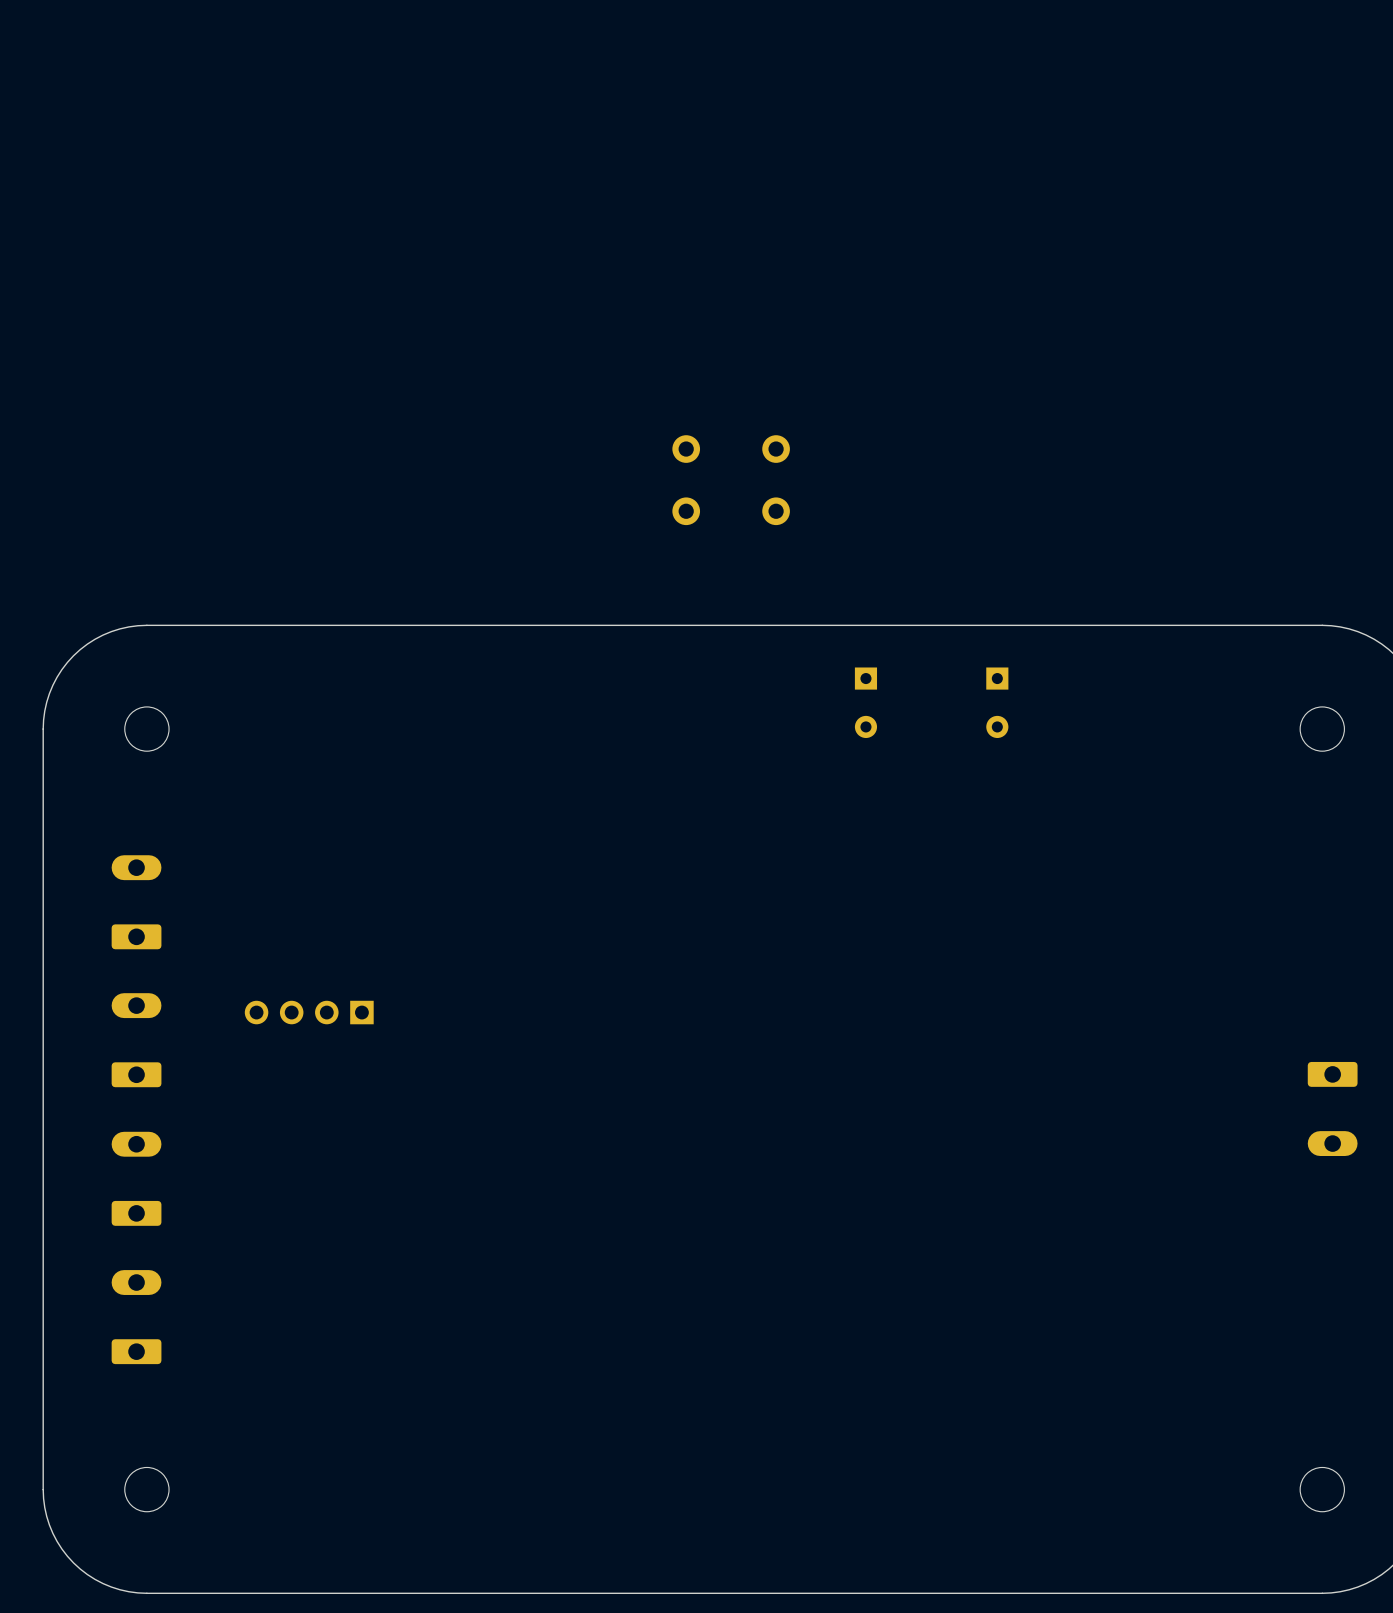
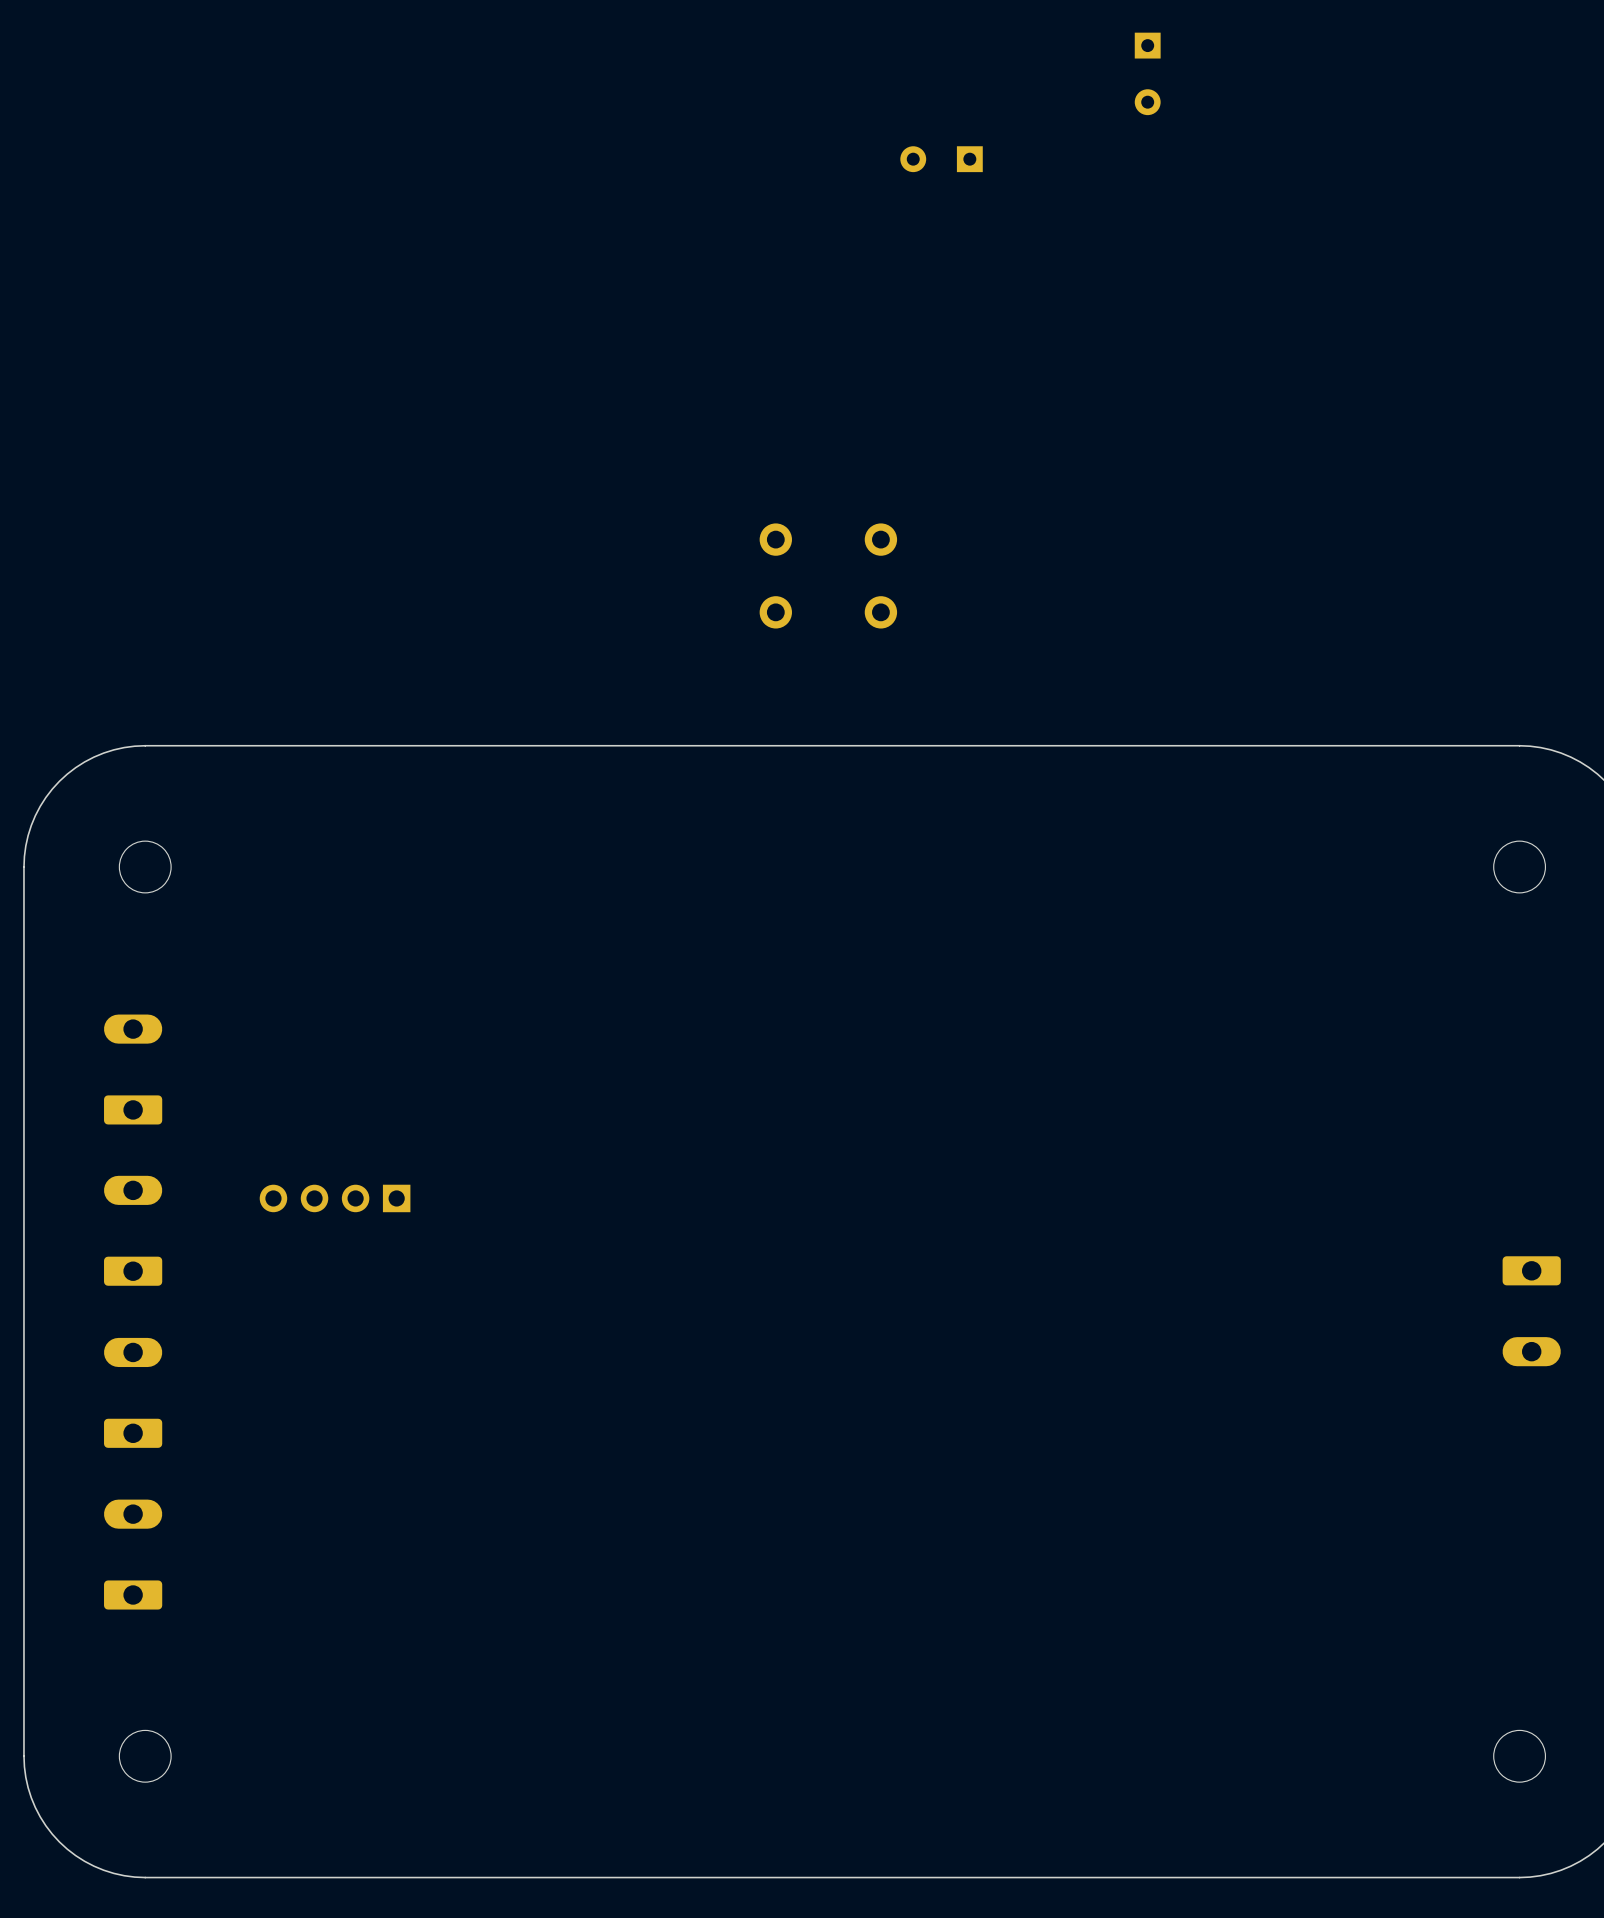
part: none -> (1147, 73)
part: none -> (941, 159)
part: (865, 702) -> none
part: (997, 702) -> none

